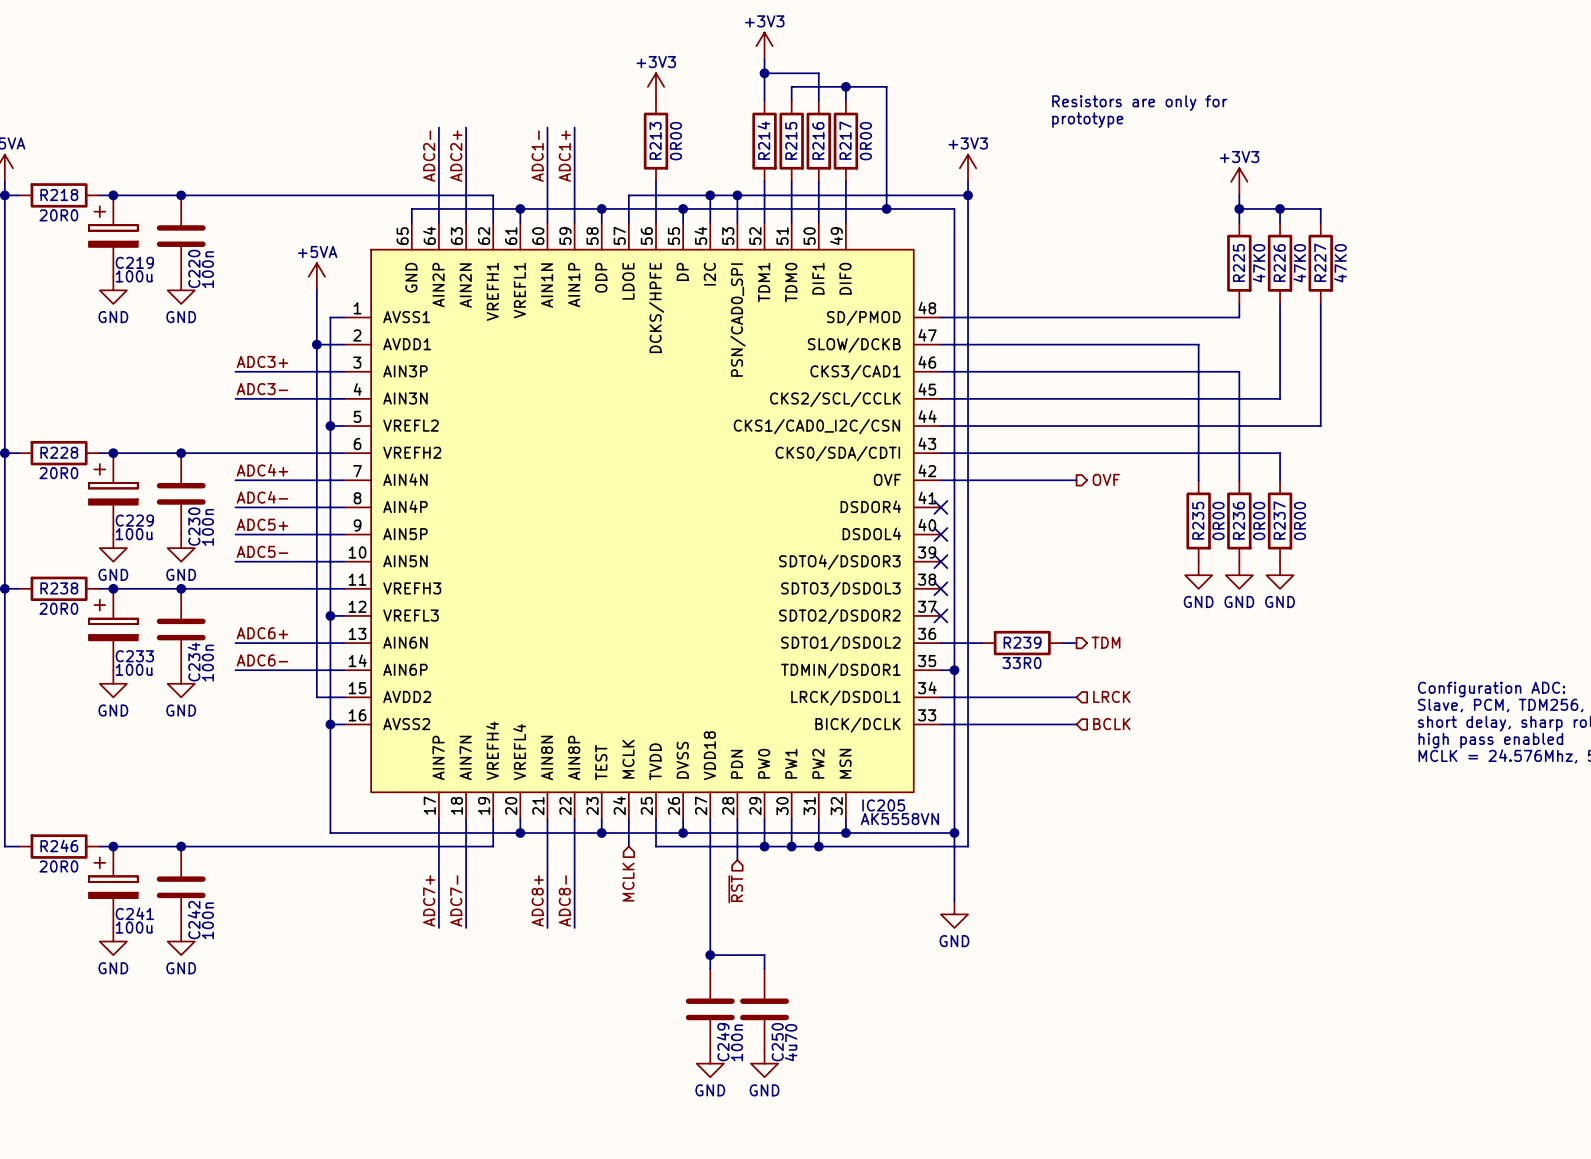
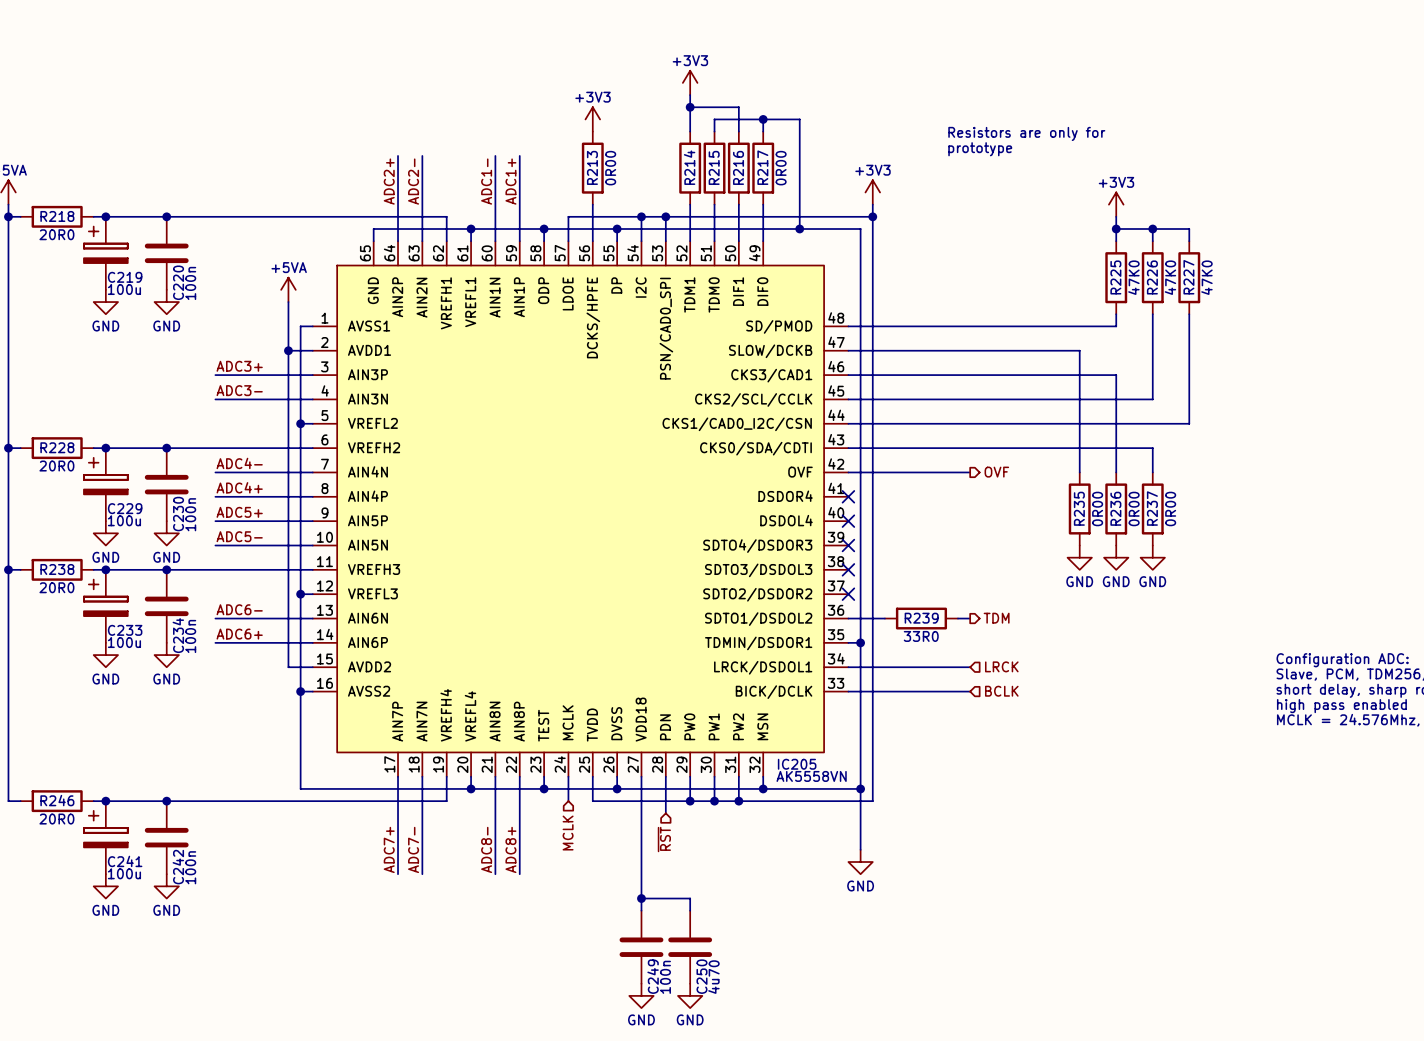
label: ADC2- (429, 156) -> ADC2+ (389, 181)
label: ADC2+ (456, 156) -> ADC2- (413, 181)
label: ADC4+ (262, 470) -> ADC4- (239, 463)
label: ADC4- (262, 497) -> ADC4+ (239, 487)
label: ADC6+ (262, 633) -> ADC6- (239, 609)
label: ADC6- (262, 660) -> ADC6+ (239, 634)
label: ADC8+ (537, 900) -> ADC8- (486, 849)
label: ADC8- (564, 900) -> ADC8+ (510, 849)

